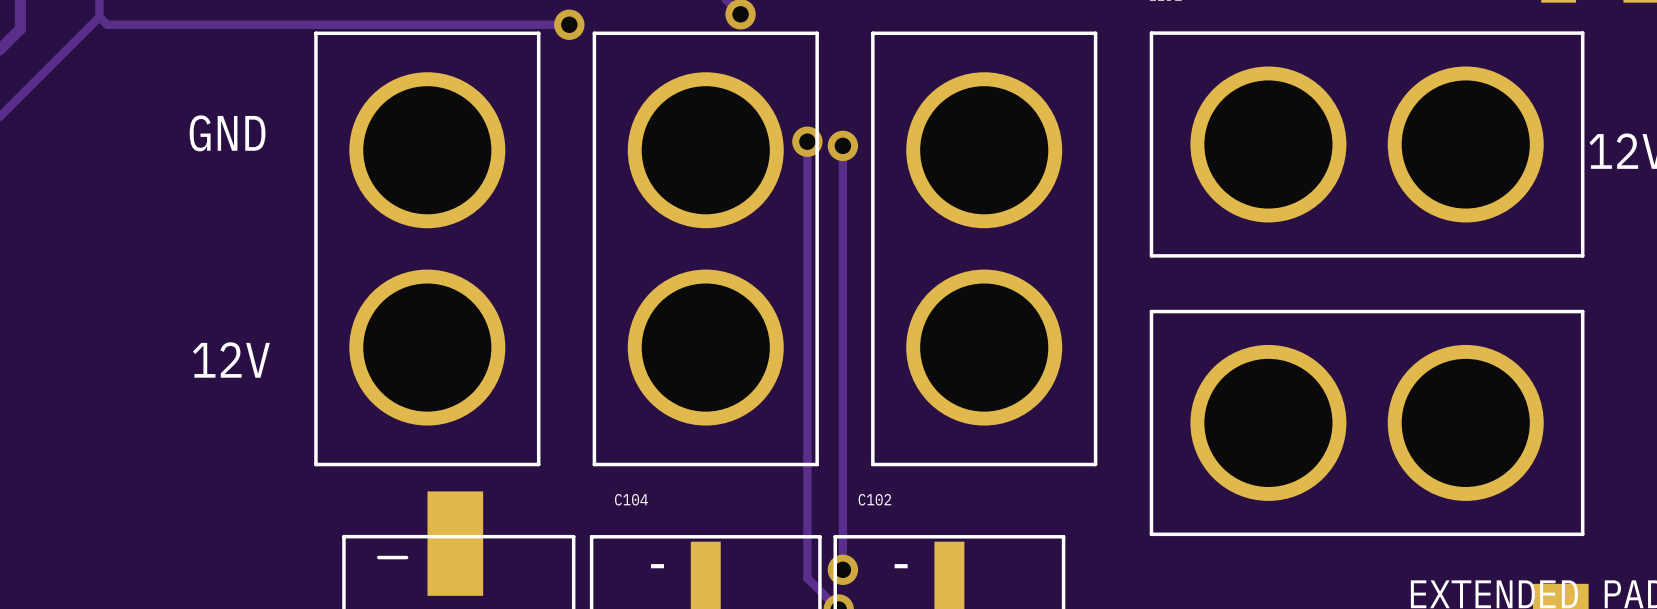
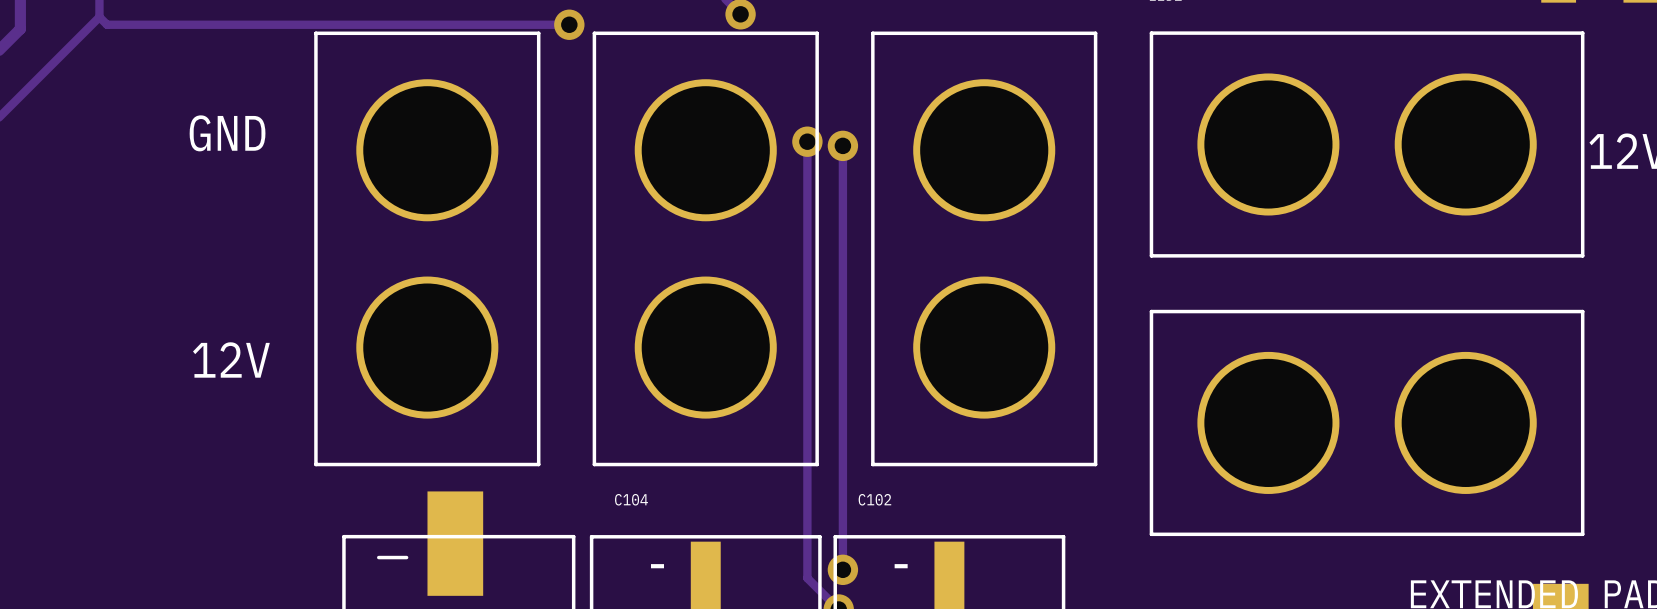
part footprint: [314, 31, 541, 467] -> [314, 31, 541, 467]
part footprint: [592, 31, 819, 467] -> [592, 31, 819, 467]
part footprint: [871, 31, 1098, 467] -> [871, 31, 1098, 467]
part footprint: [1149, 31, 1585, 258] -> [1149, 31, 1585, 258]
part footprint: [1149, 309, 1585, 537] -> [1149, 309, 1585, 537]

